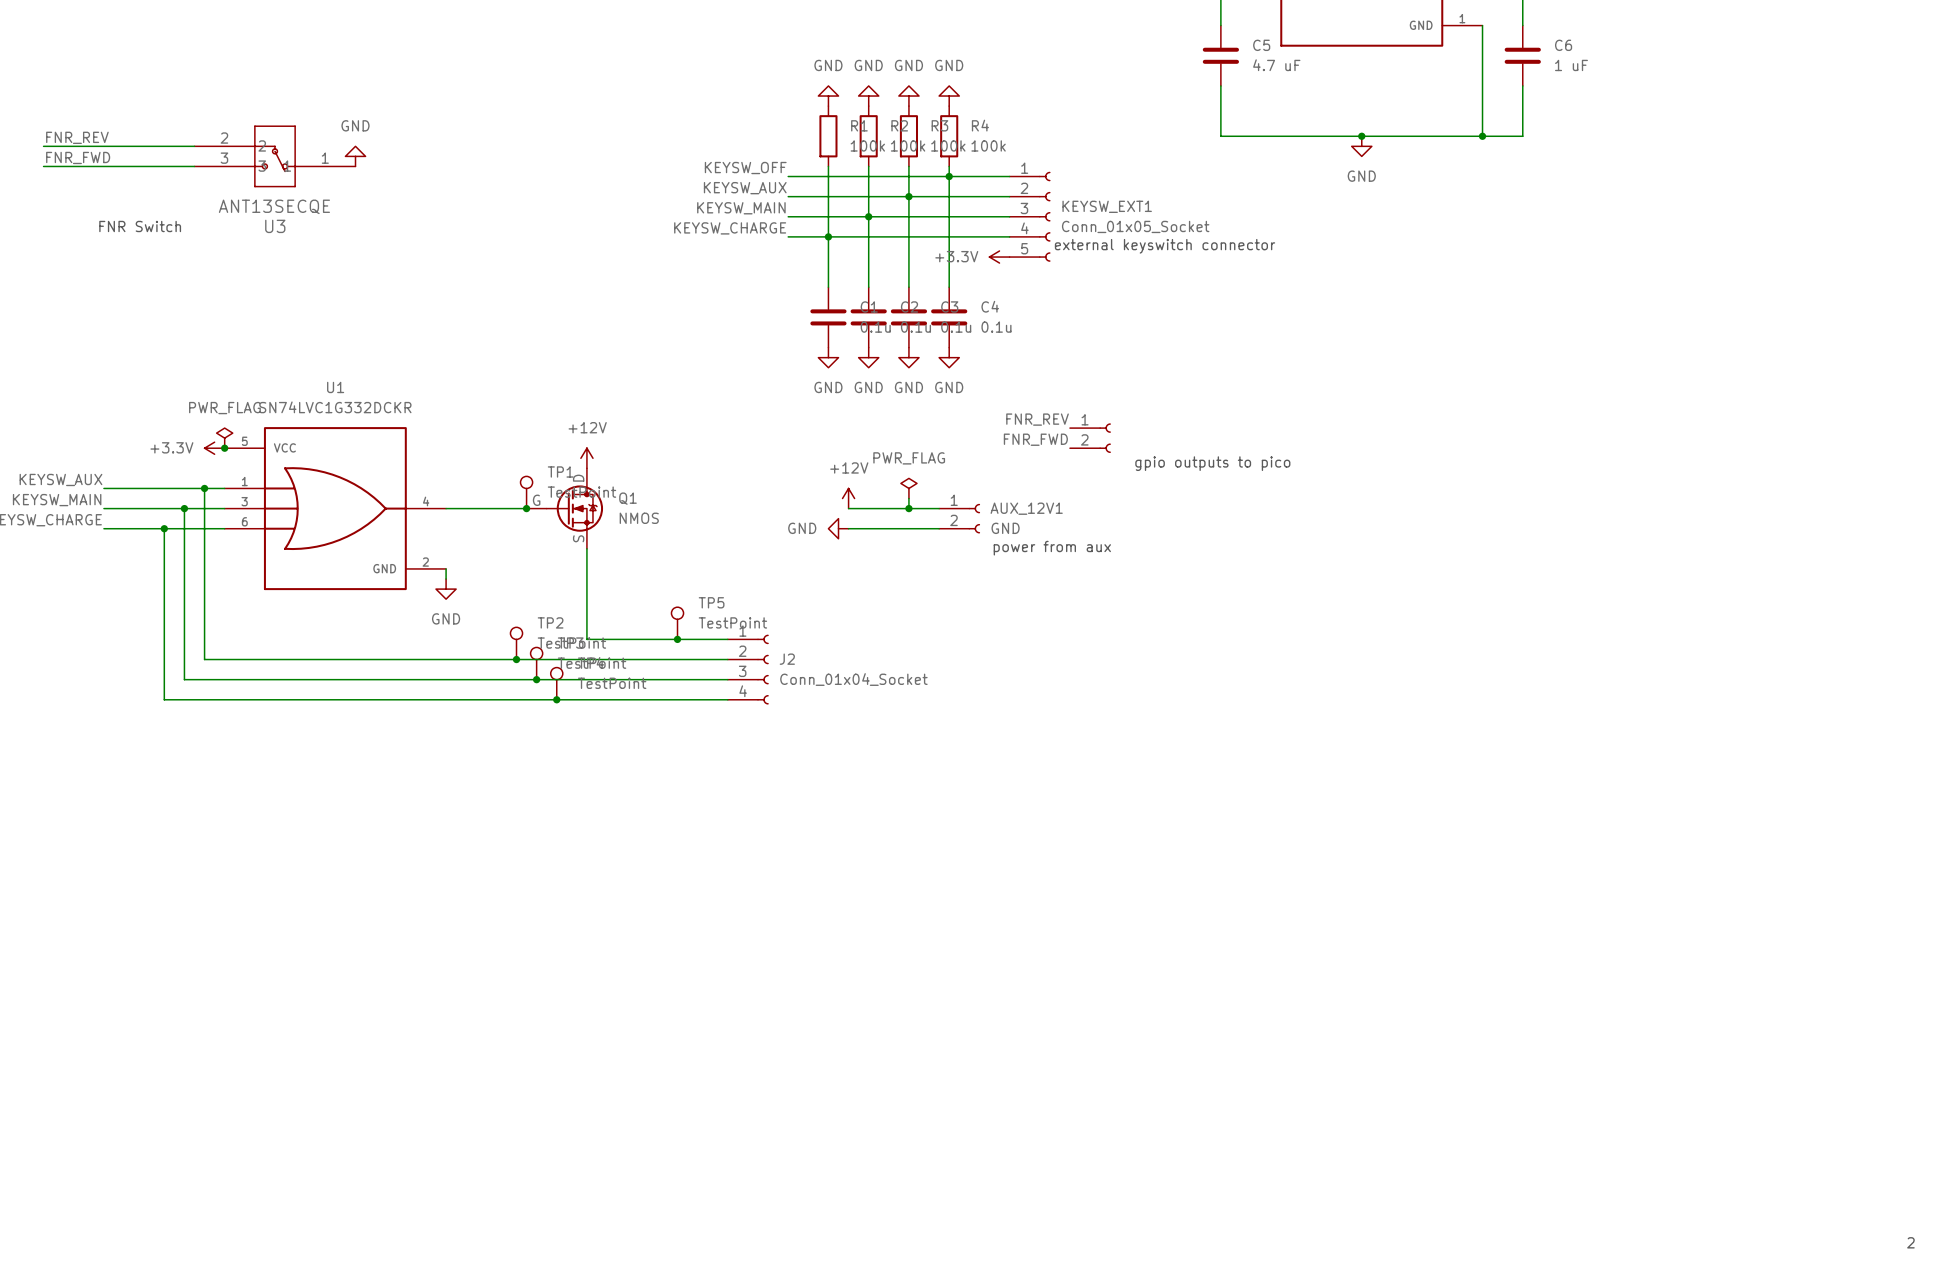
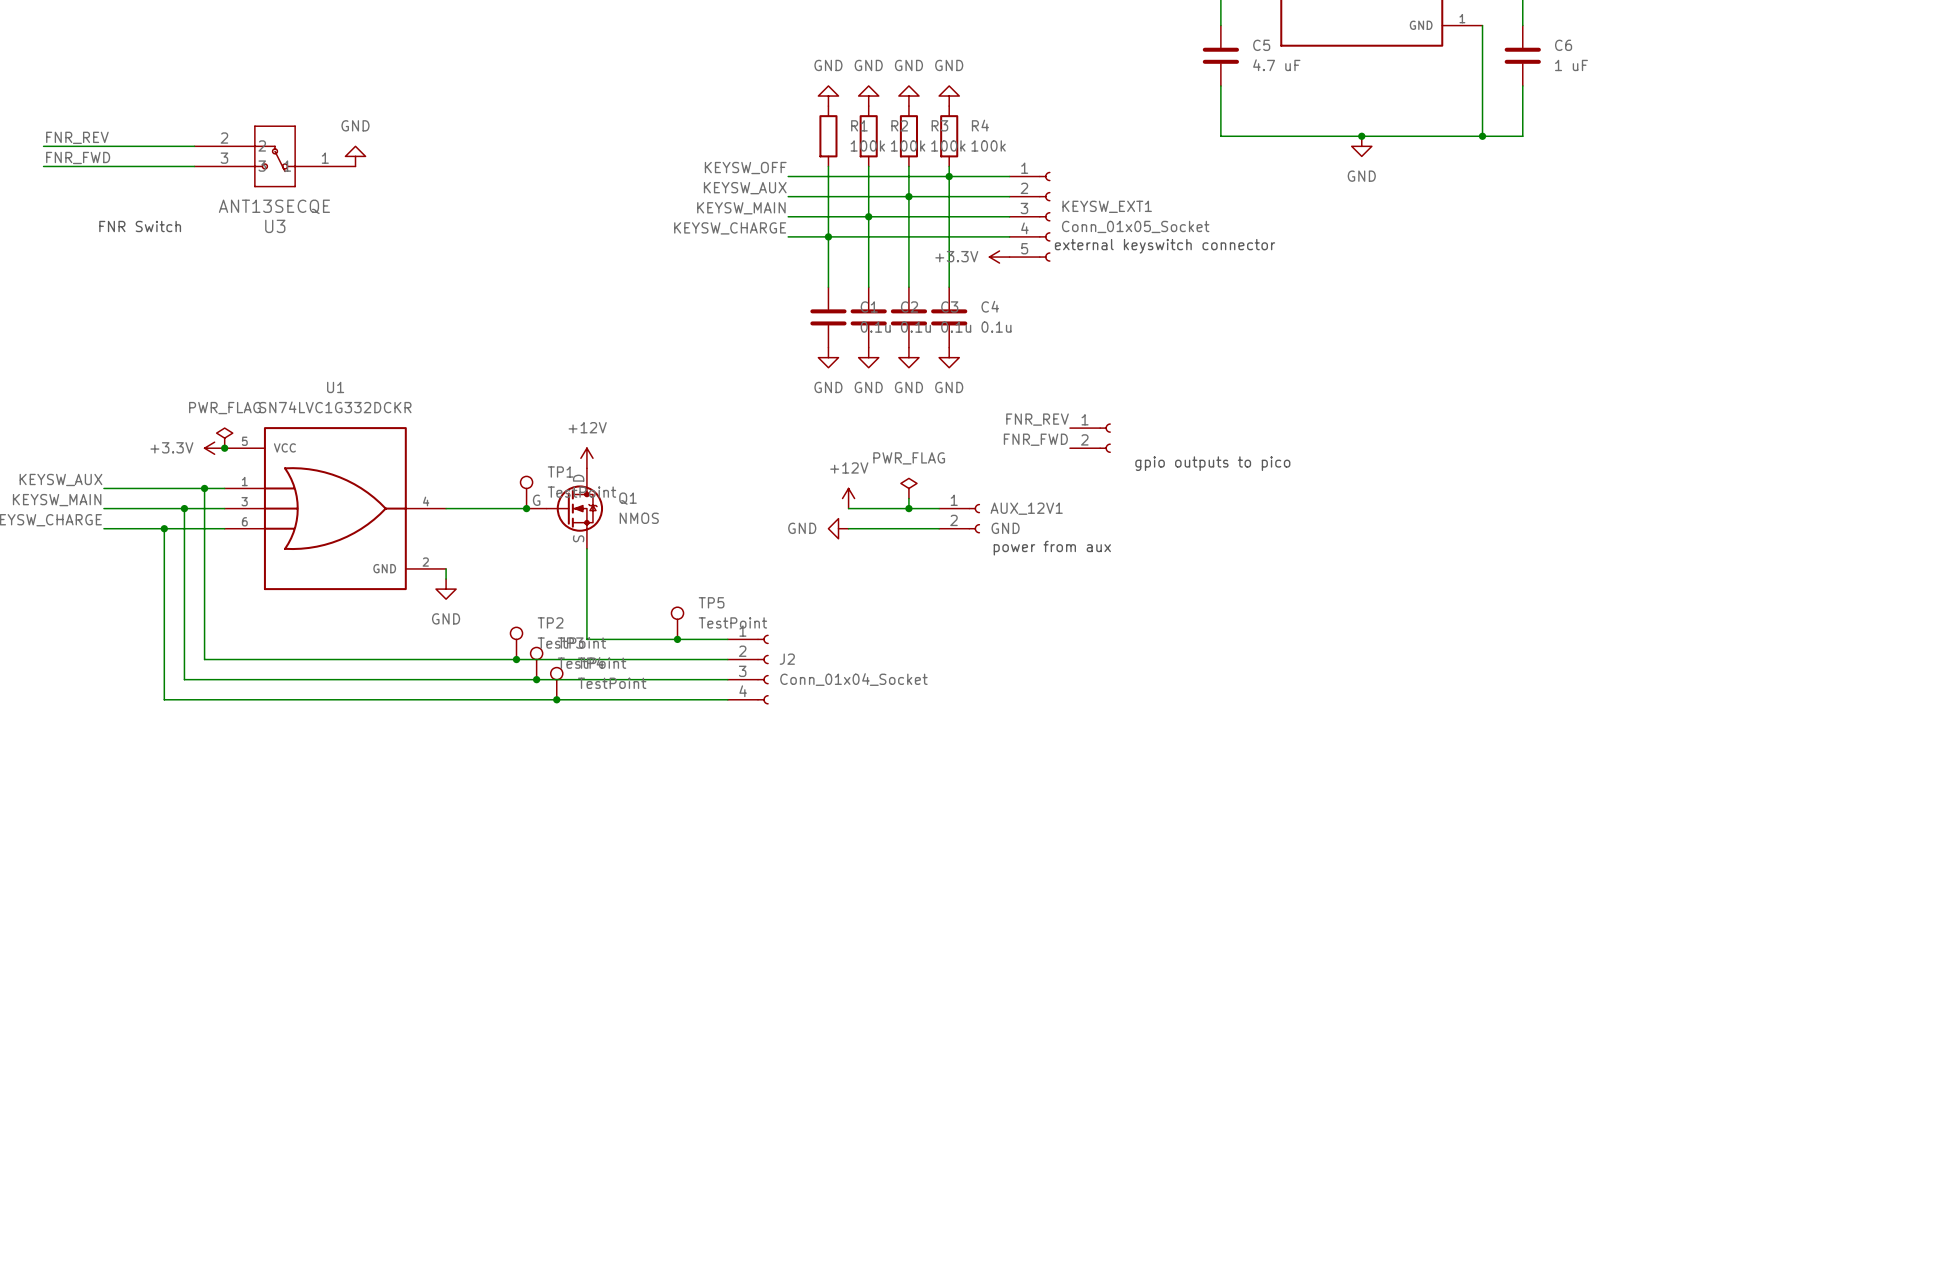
text: 2 (1910, 1242) -> none

